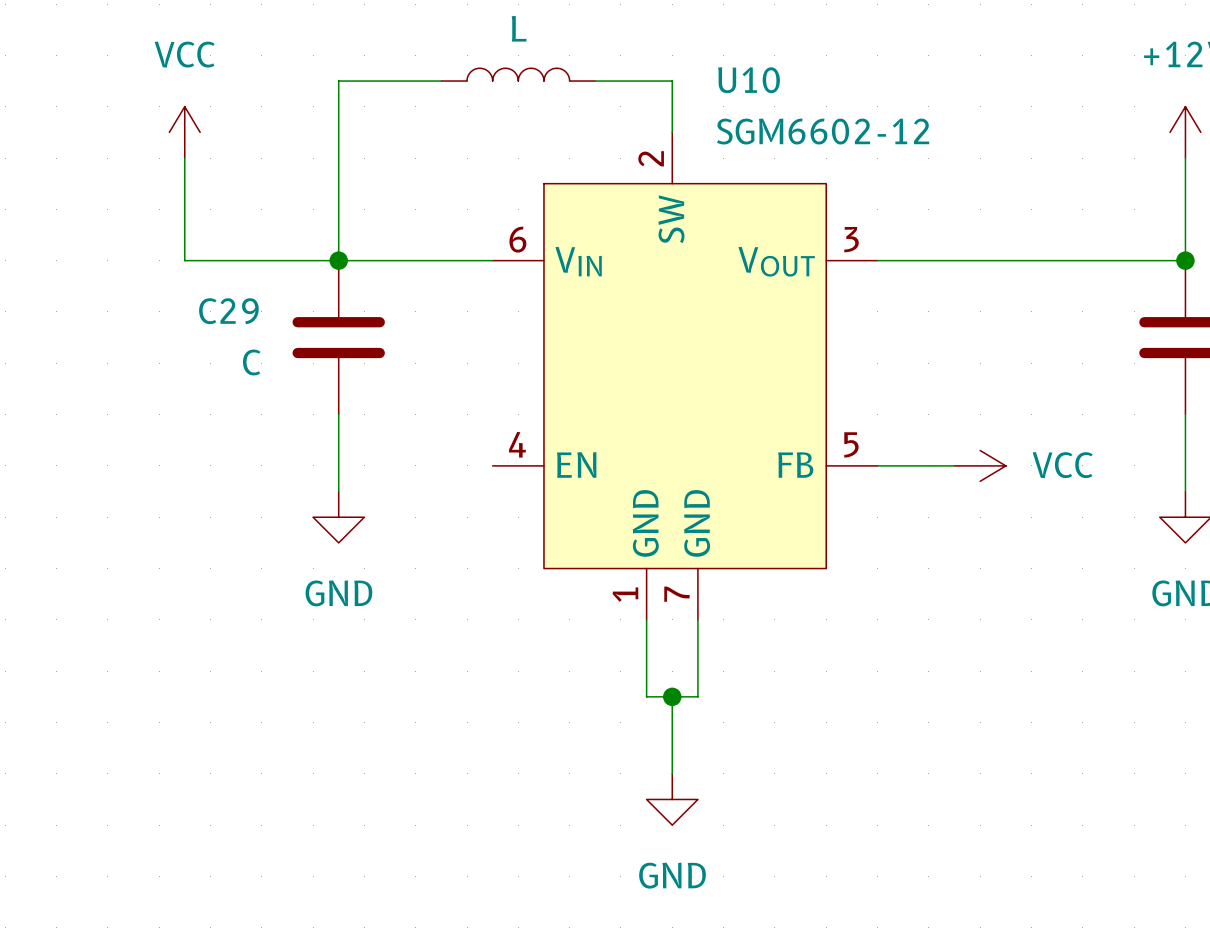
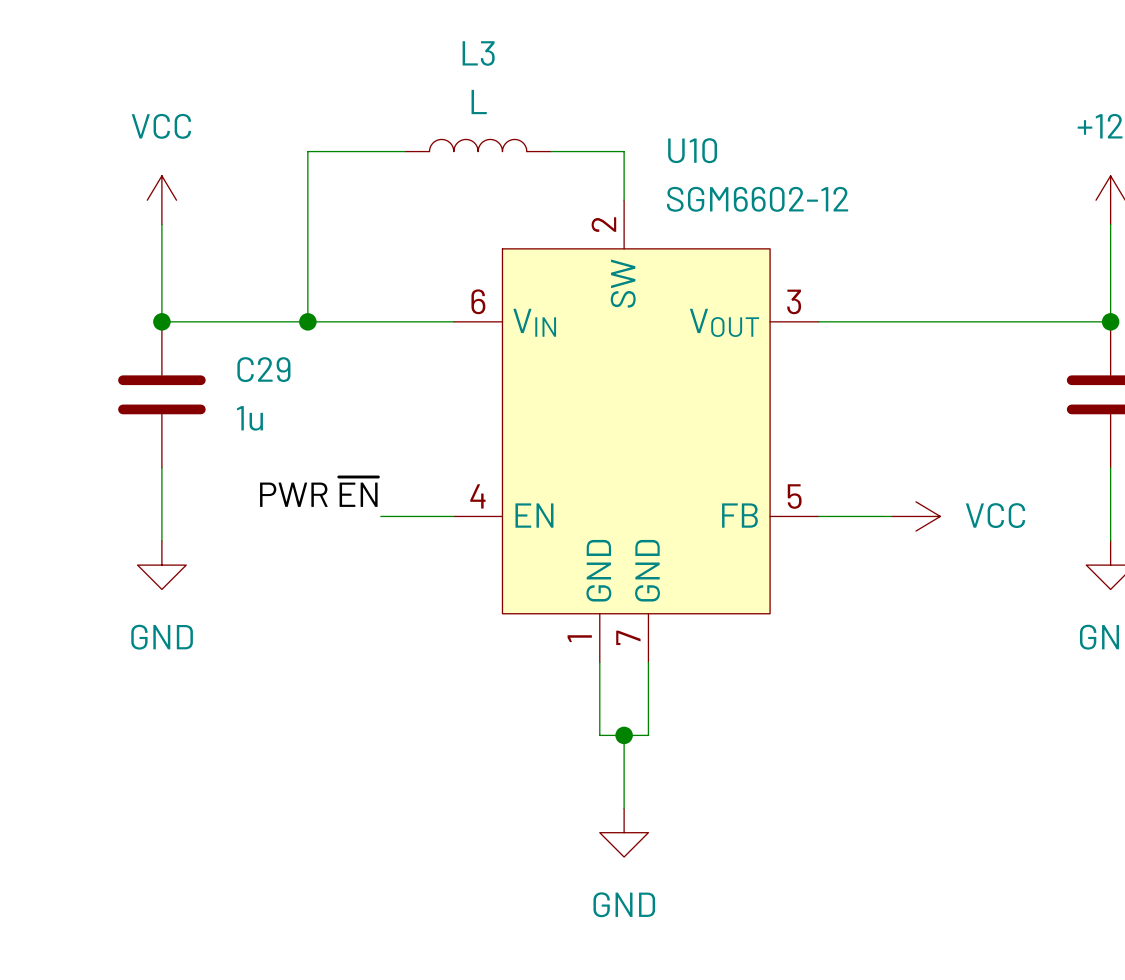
junction: none -> (161, 321)
C29 name position: C29 (228, 311) -> C29 (263, 369)
C29 position: (338, 337) -> (161, 394)
C29 value: C (251, 362) -> 1u (249, 418)
wire: (338, 414) (338, 491) -> (161, 467) (161, 540)
label: none -> PWR ~{EN} (319, 491)
wire: none -> (380, 516) (453, 516)
power symbol position: GND (338, 517) -> GND (161, 565)

